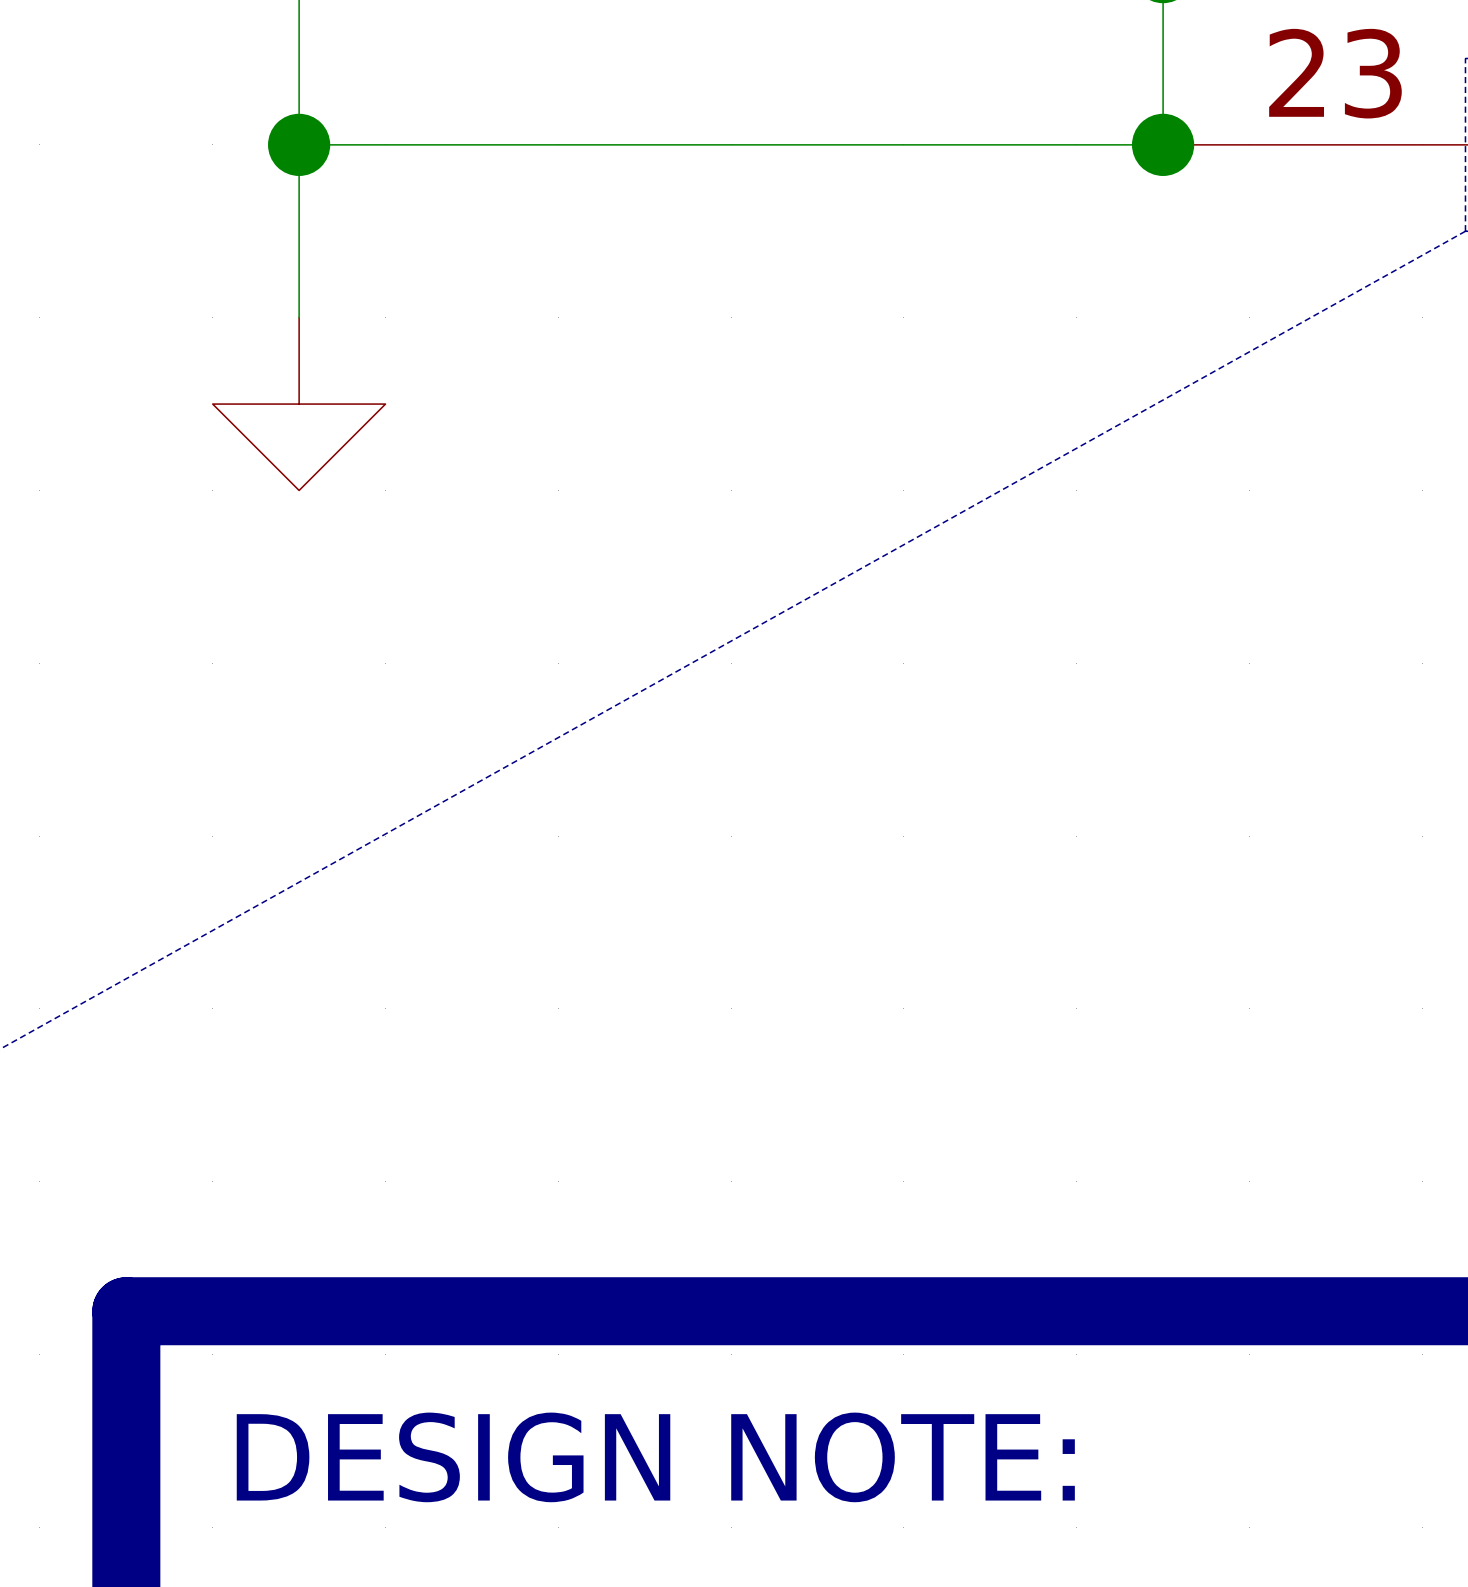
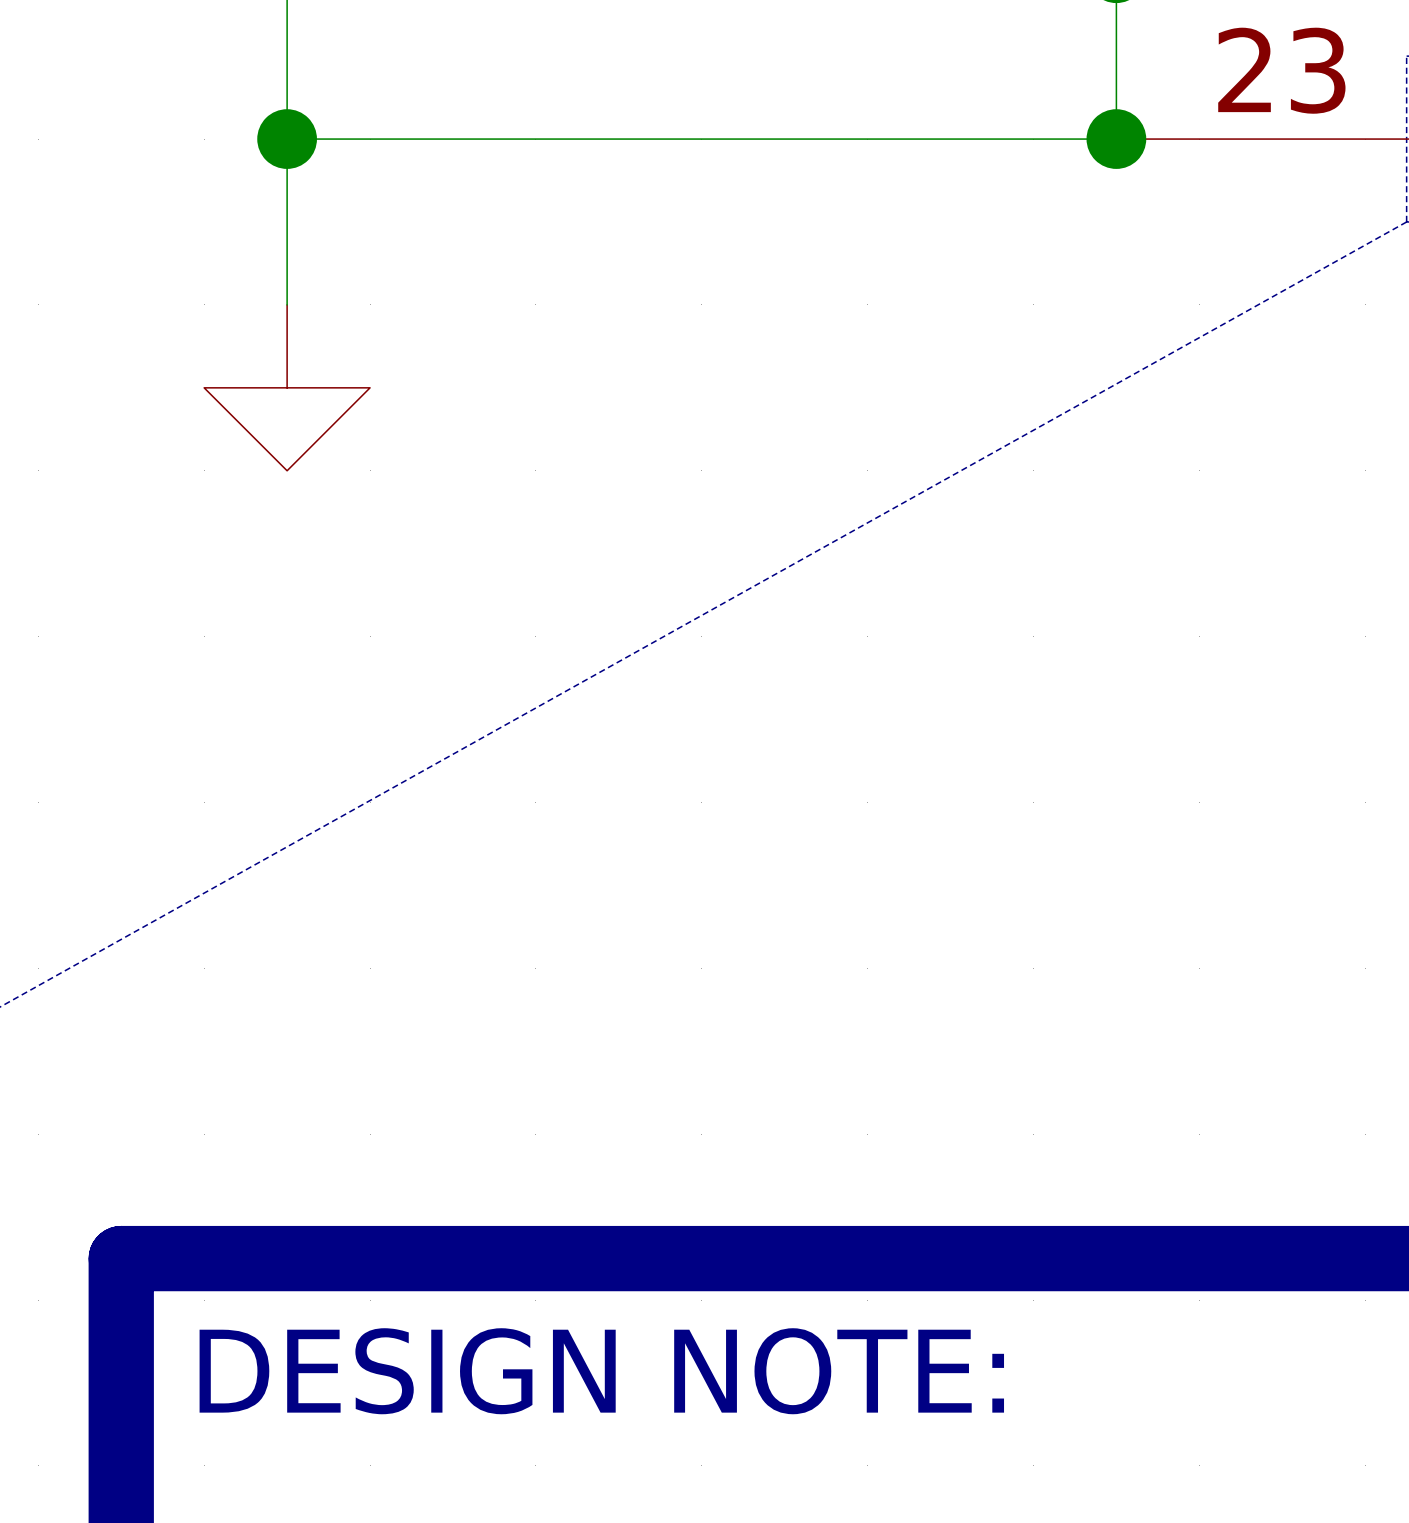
text position: DESIGN NOTE: (655, 1457) -> DESIGN NOTE: (601, 1371)

